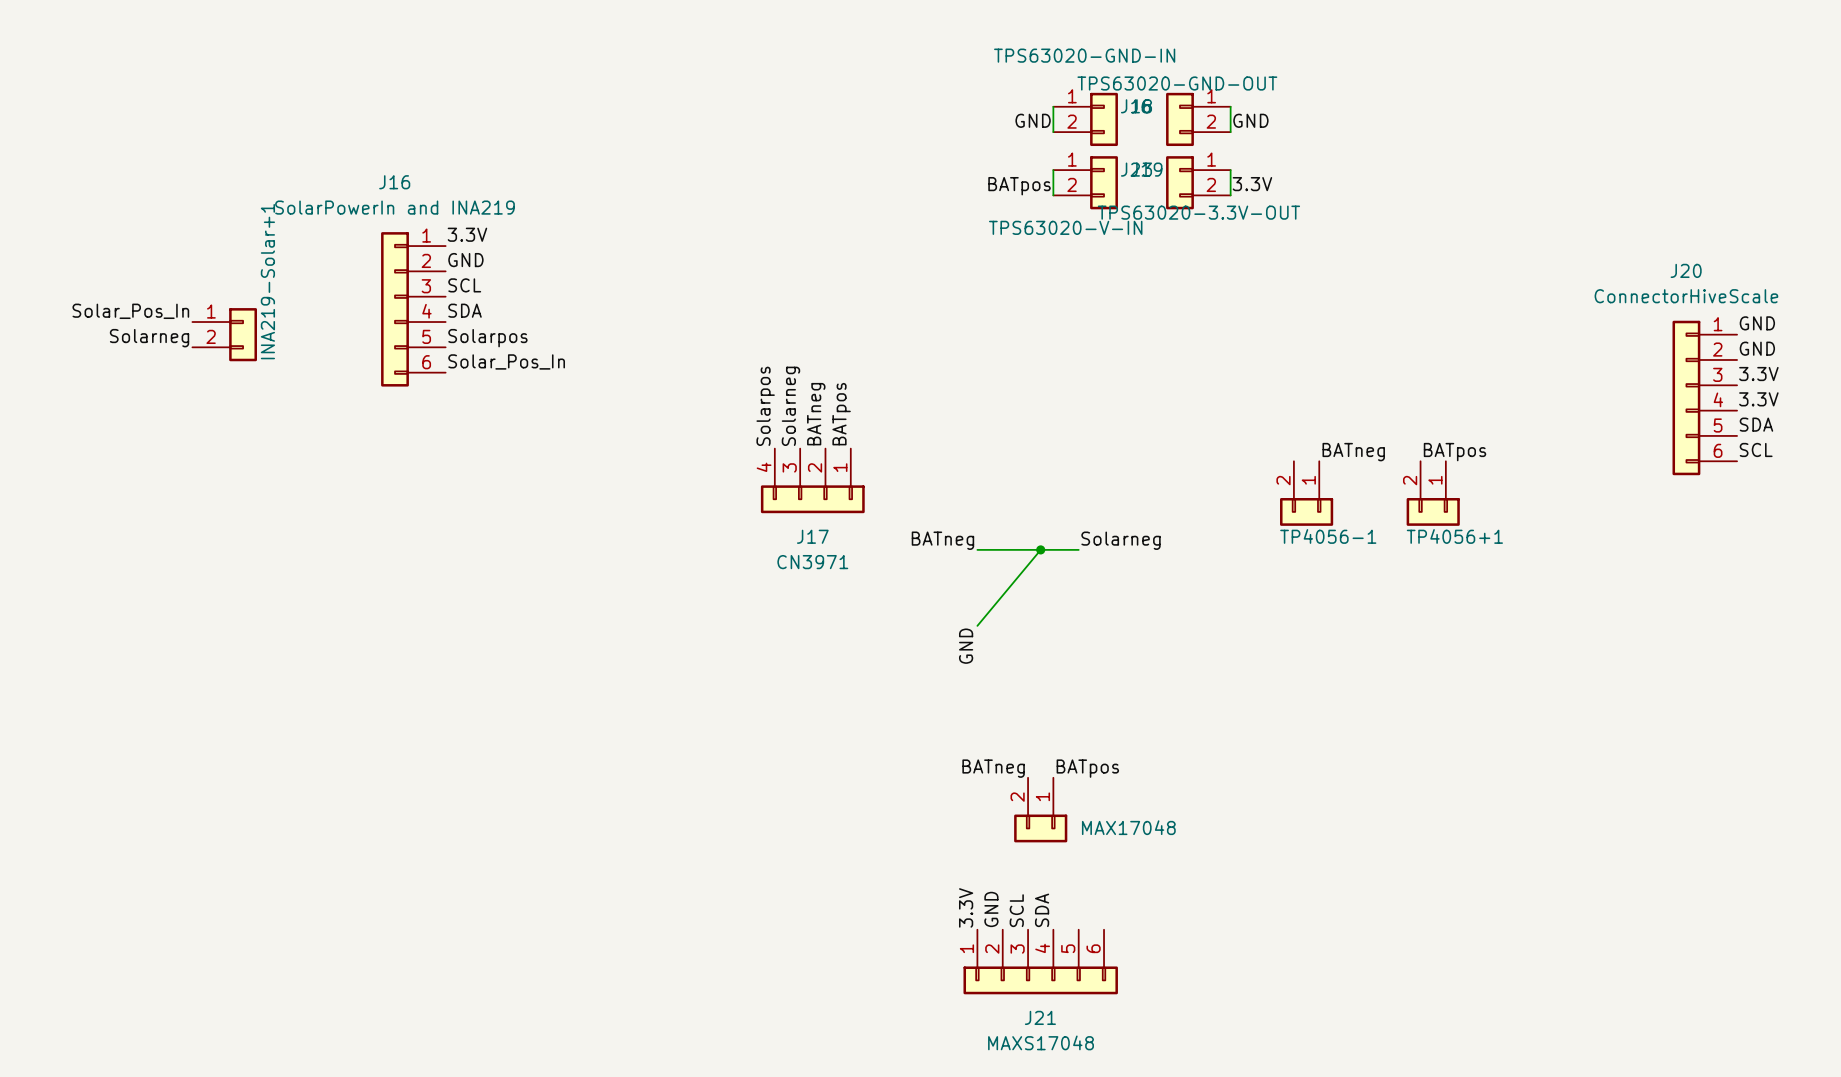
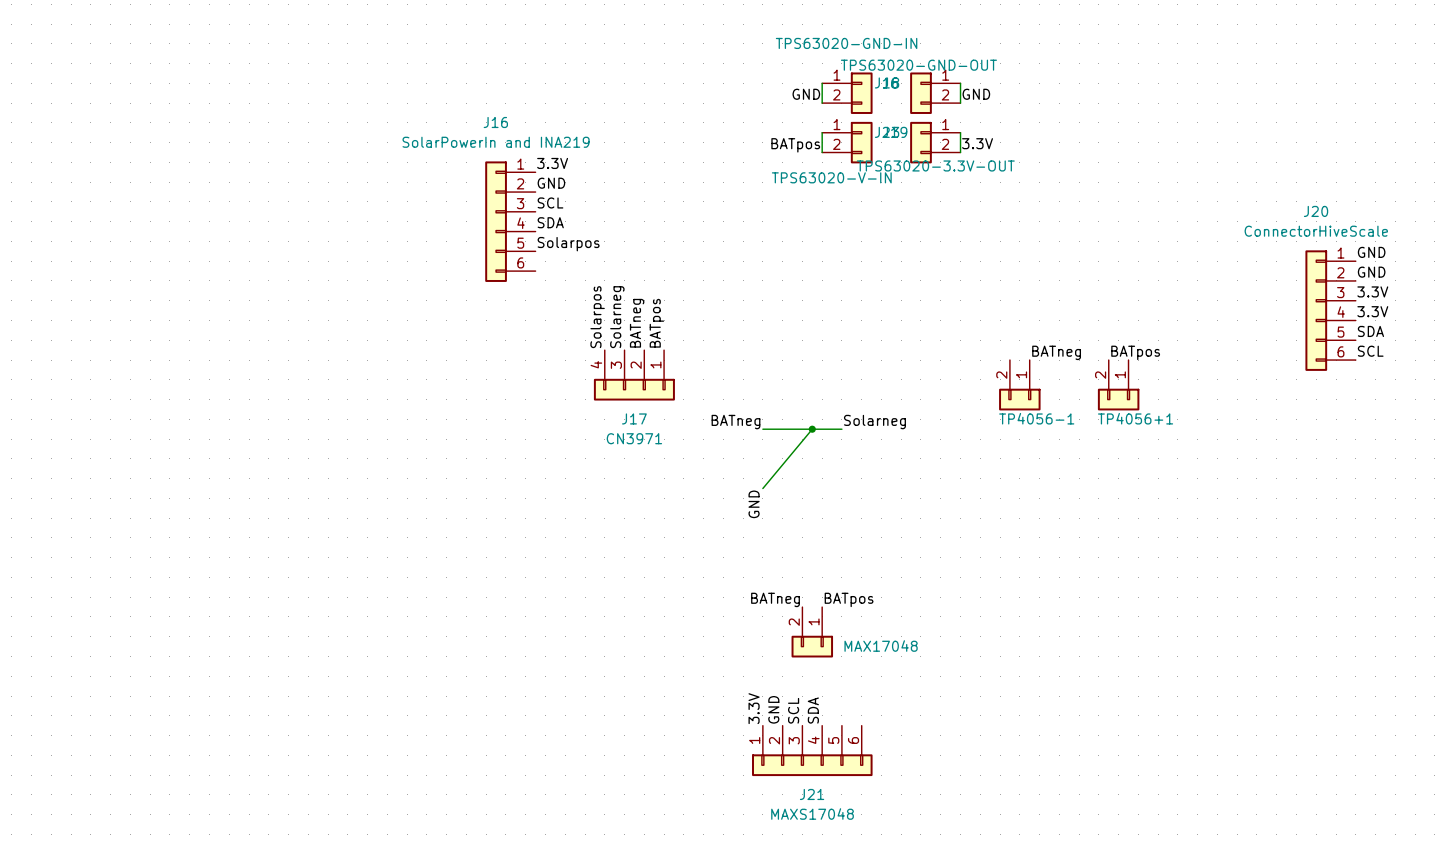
label position: 3.3V (467, 234) -> 3.3V (552, 163)
label position: GND (465, 260) -> GND (551, 183)
label position: SCL (464, 285) -> SCL (550, 202)
J16 position: (413, 309) -> (510, 221)
label position: SDA (465, 310) -> SDA (550, 222)
label: Solar_Pos_In (130, 311) -> none
INA219-Solar+1: (224, 334) -> none
label: Solarneg (149, 338) -> none
label position: Solarpos (487, 338) -> Solarpos (568, 244)
label: Solar_Pos_In (506, 361) -> none

